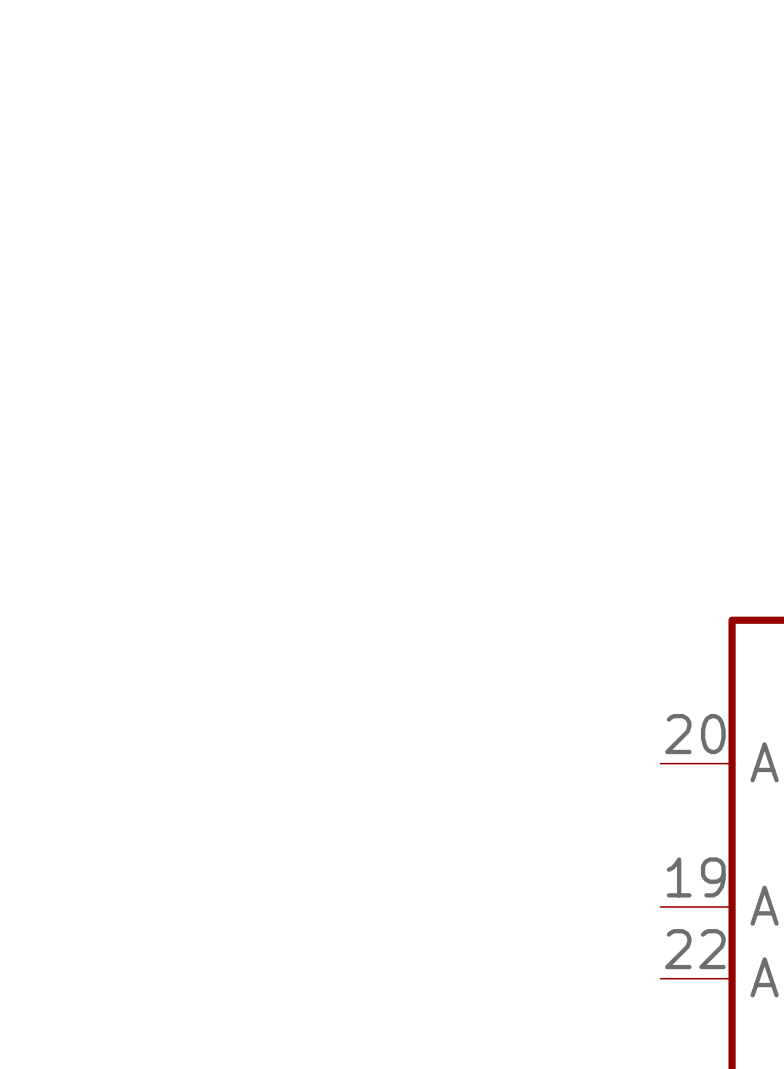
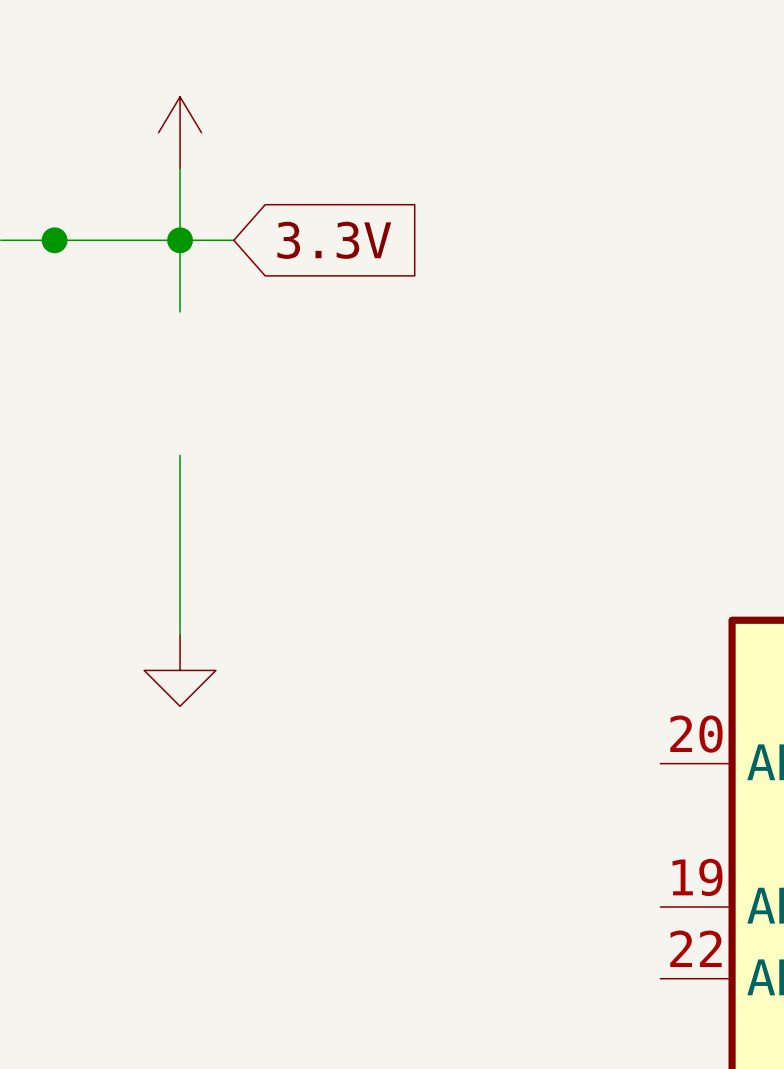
power symbol: none -> (180, 132)
wire: none -> (180, 168) (180, 311)
wire: none -> (0, 240) (233, 240)
junction: none -> (54, 240)
junction: none -> (180, 240)
global label: none -> 3.3V (334, 240)
wire: none -> (180, 455) (180, 634)
power symbol: none -> (180, 670)

